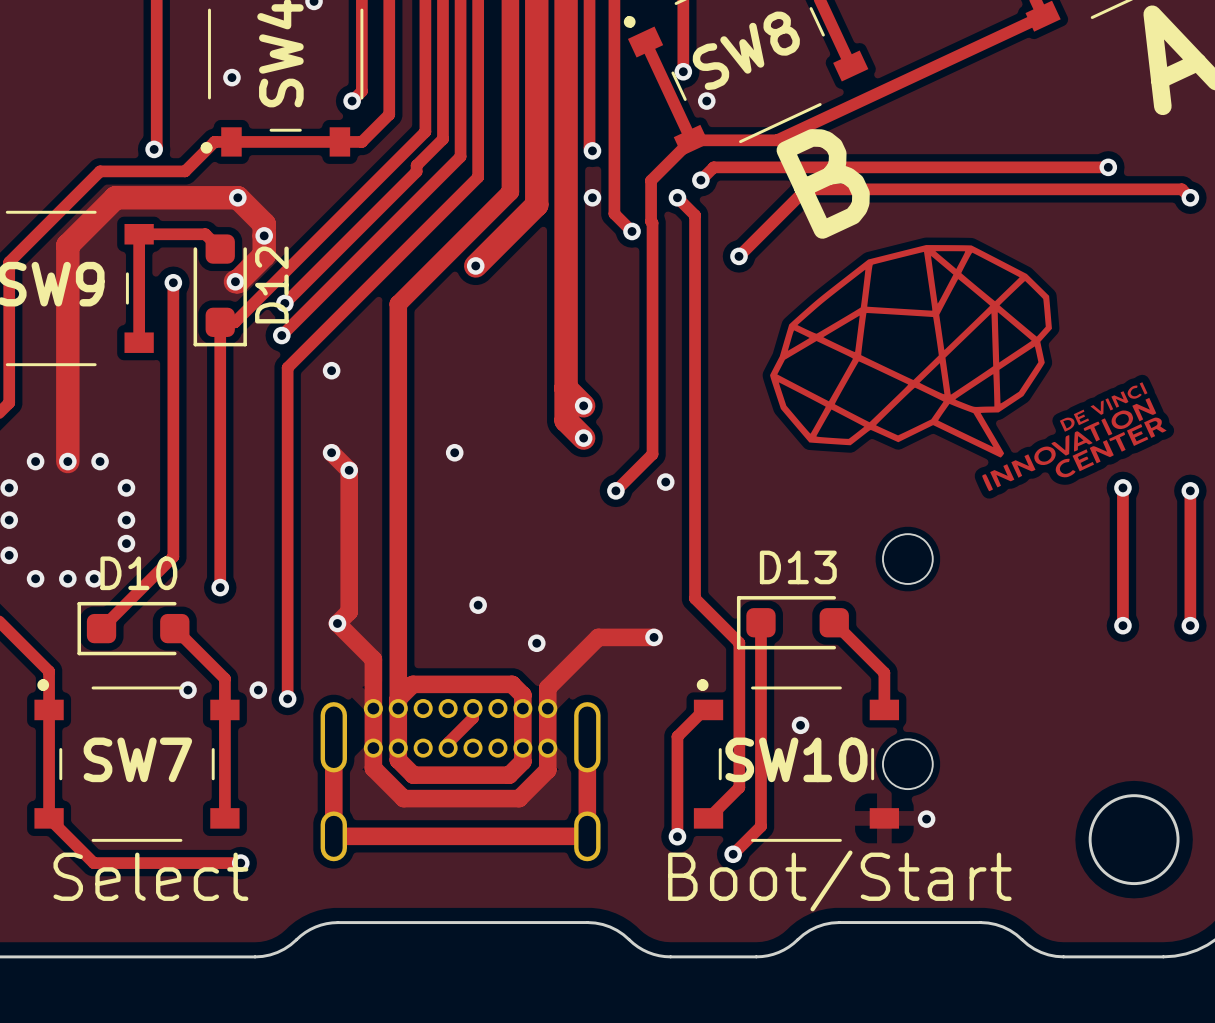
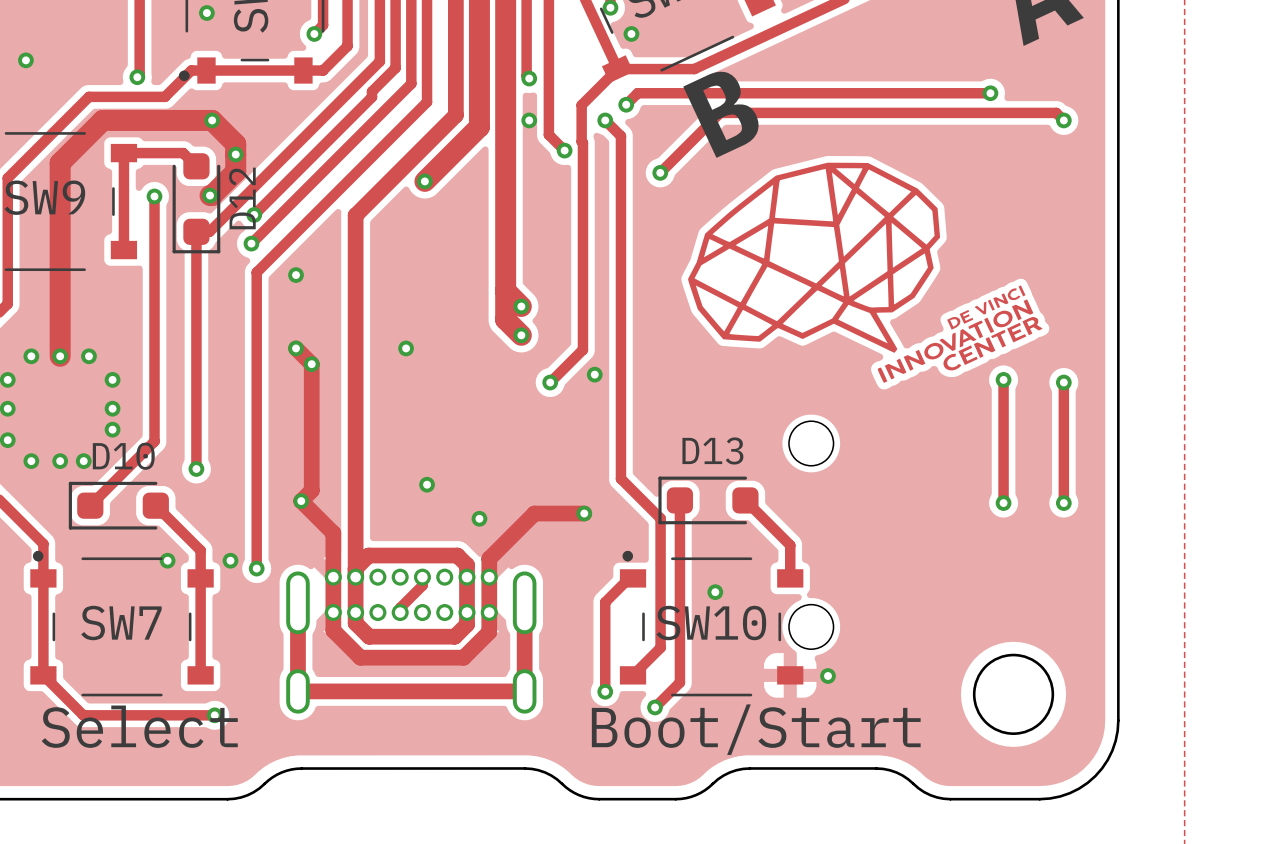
via: none -> (25, 60)

